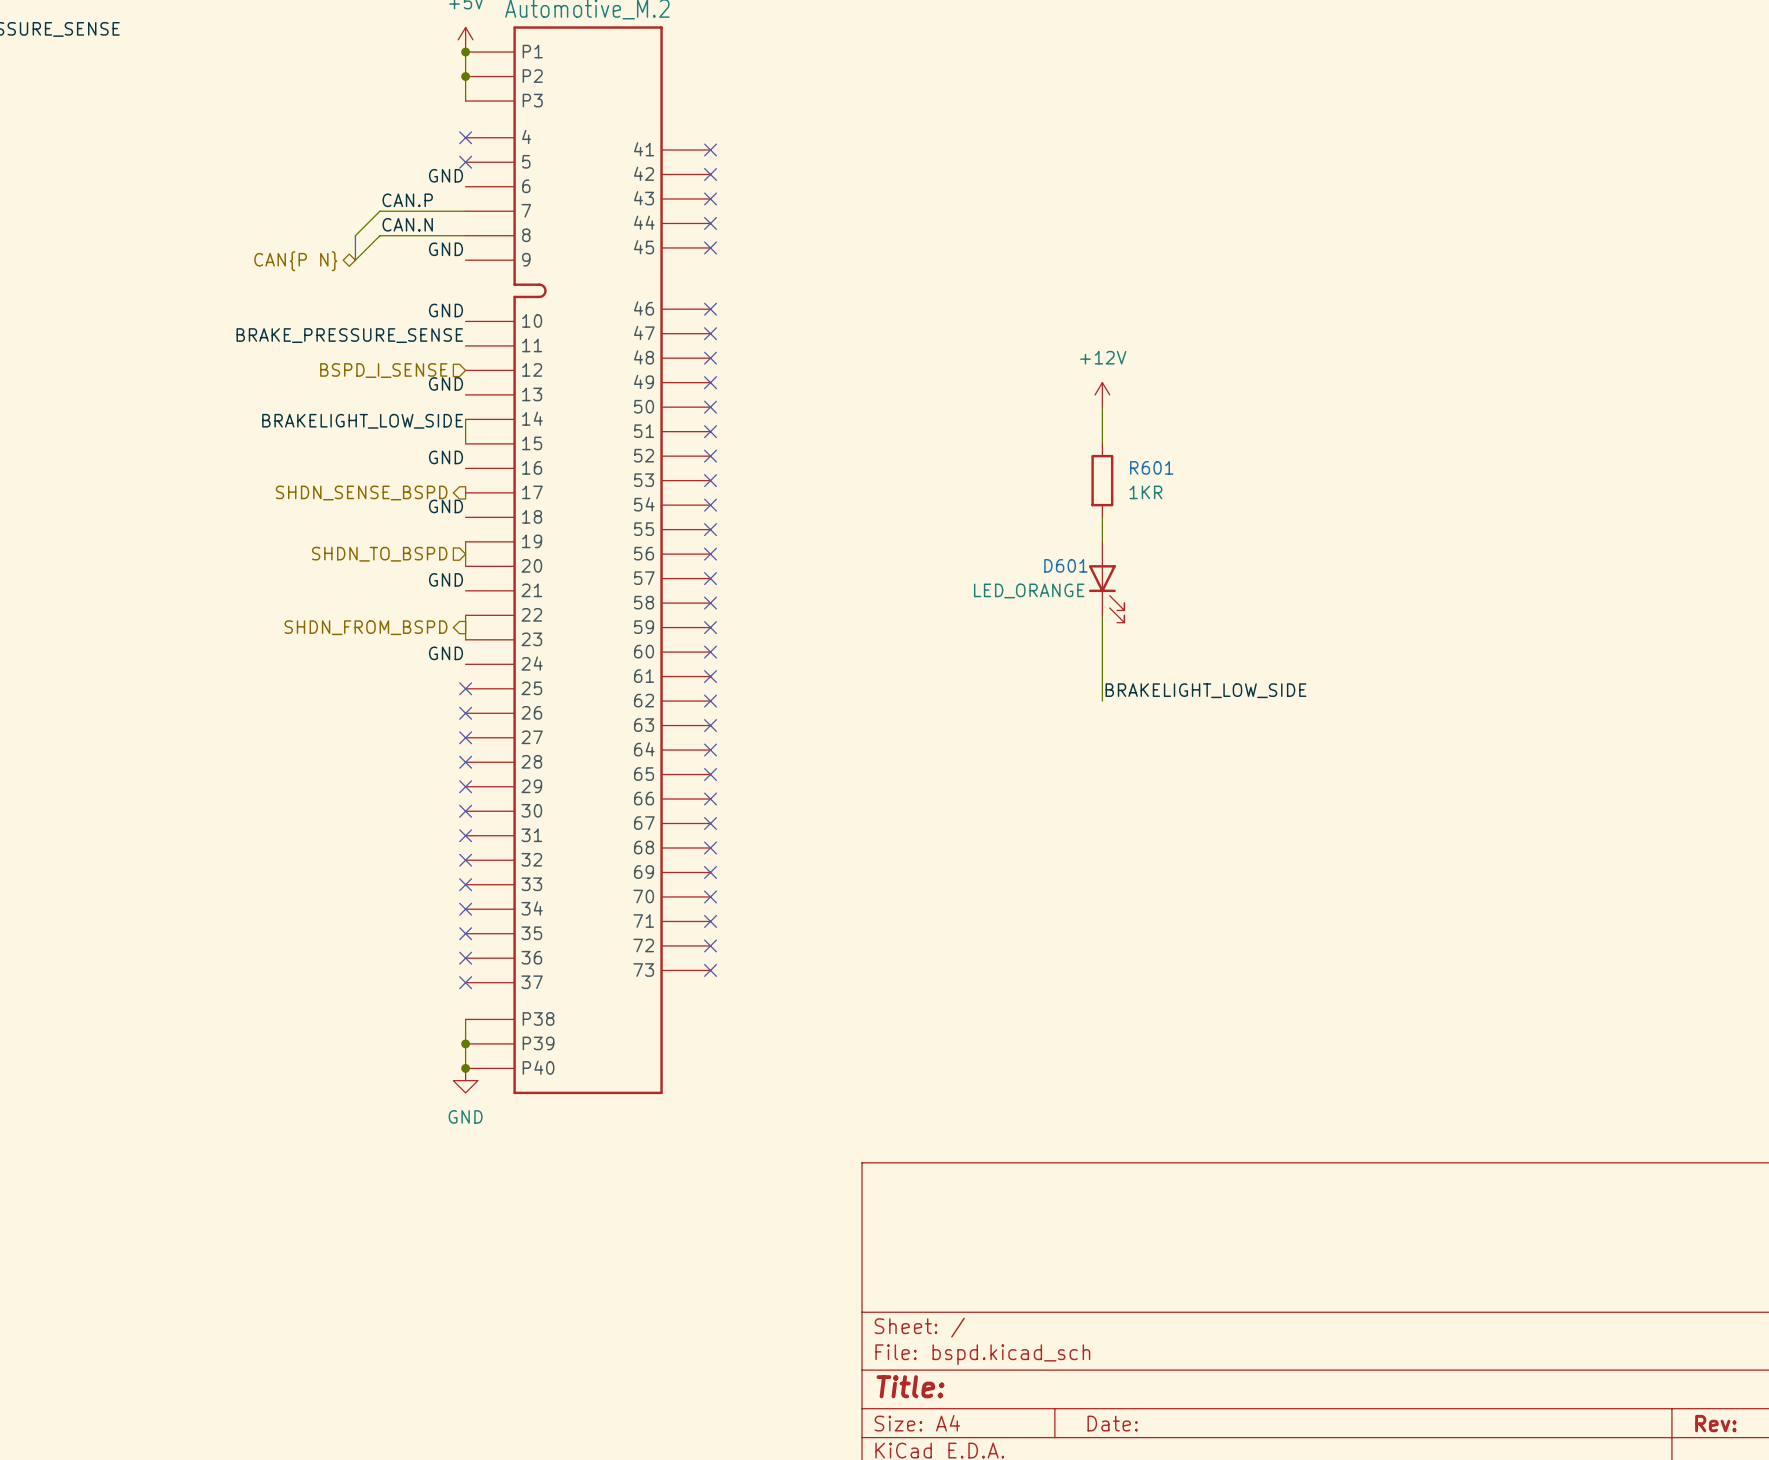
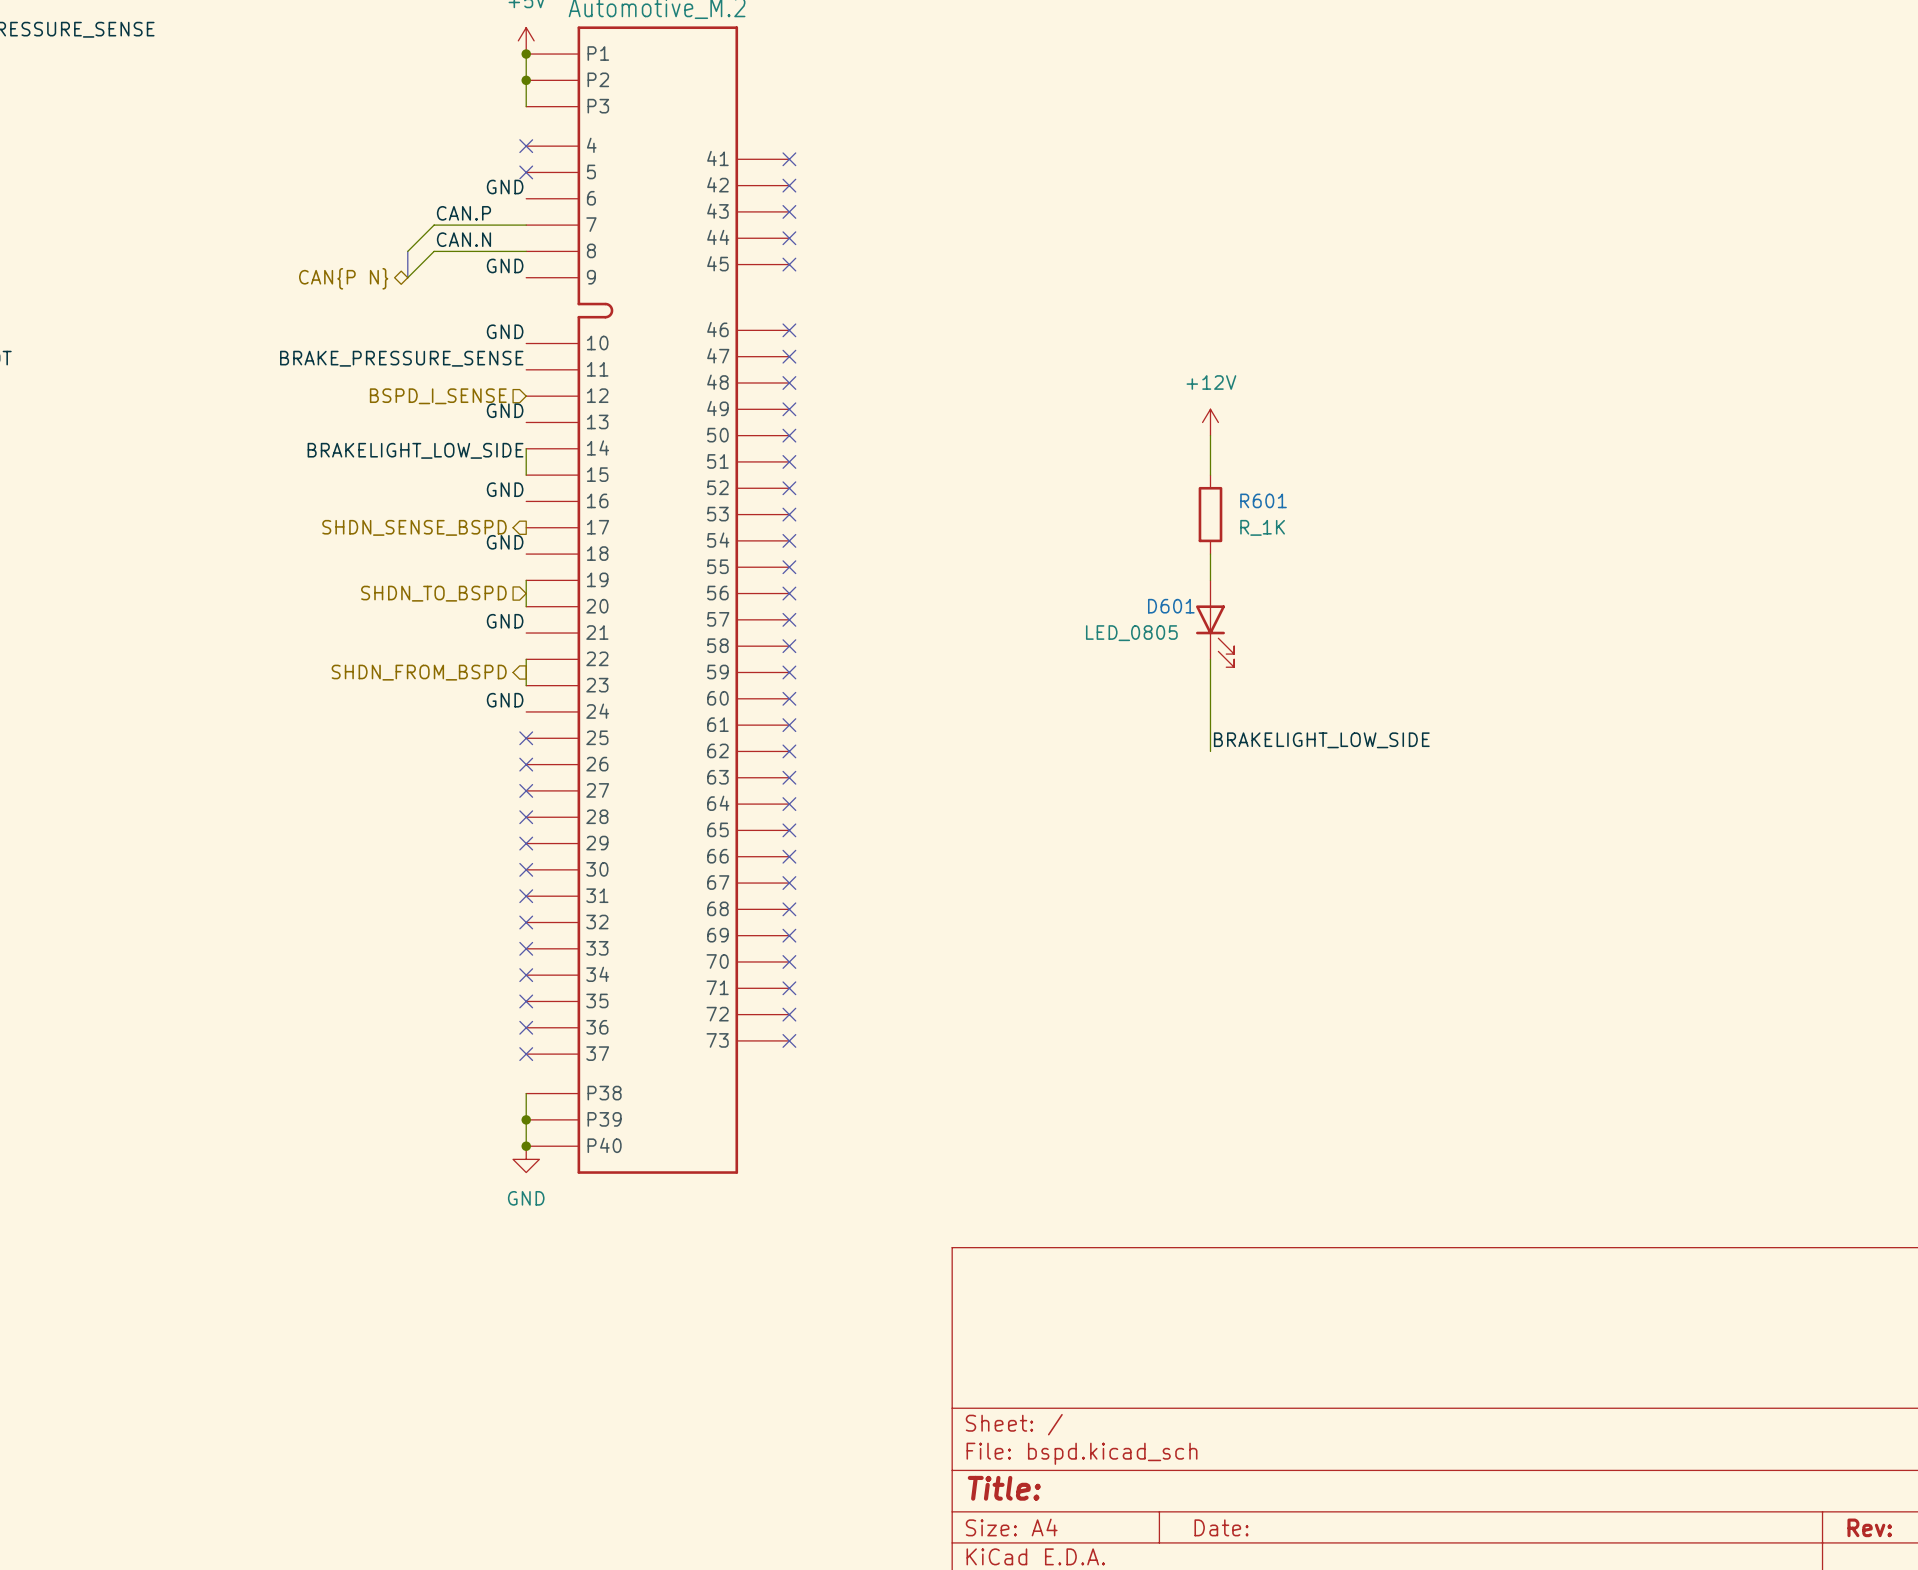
R601 value: 1KR (1145, 492) -> R_1K (1262, 527)
D601 value: LED_ORANGE (1029, 590) -> LED_0805 (1131, 633)

